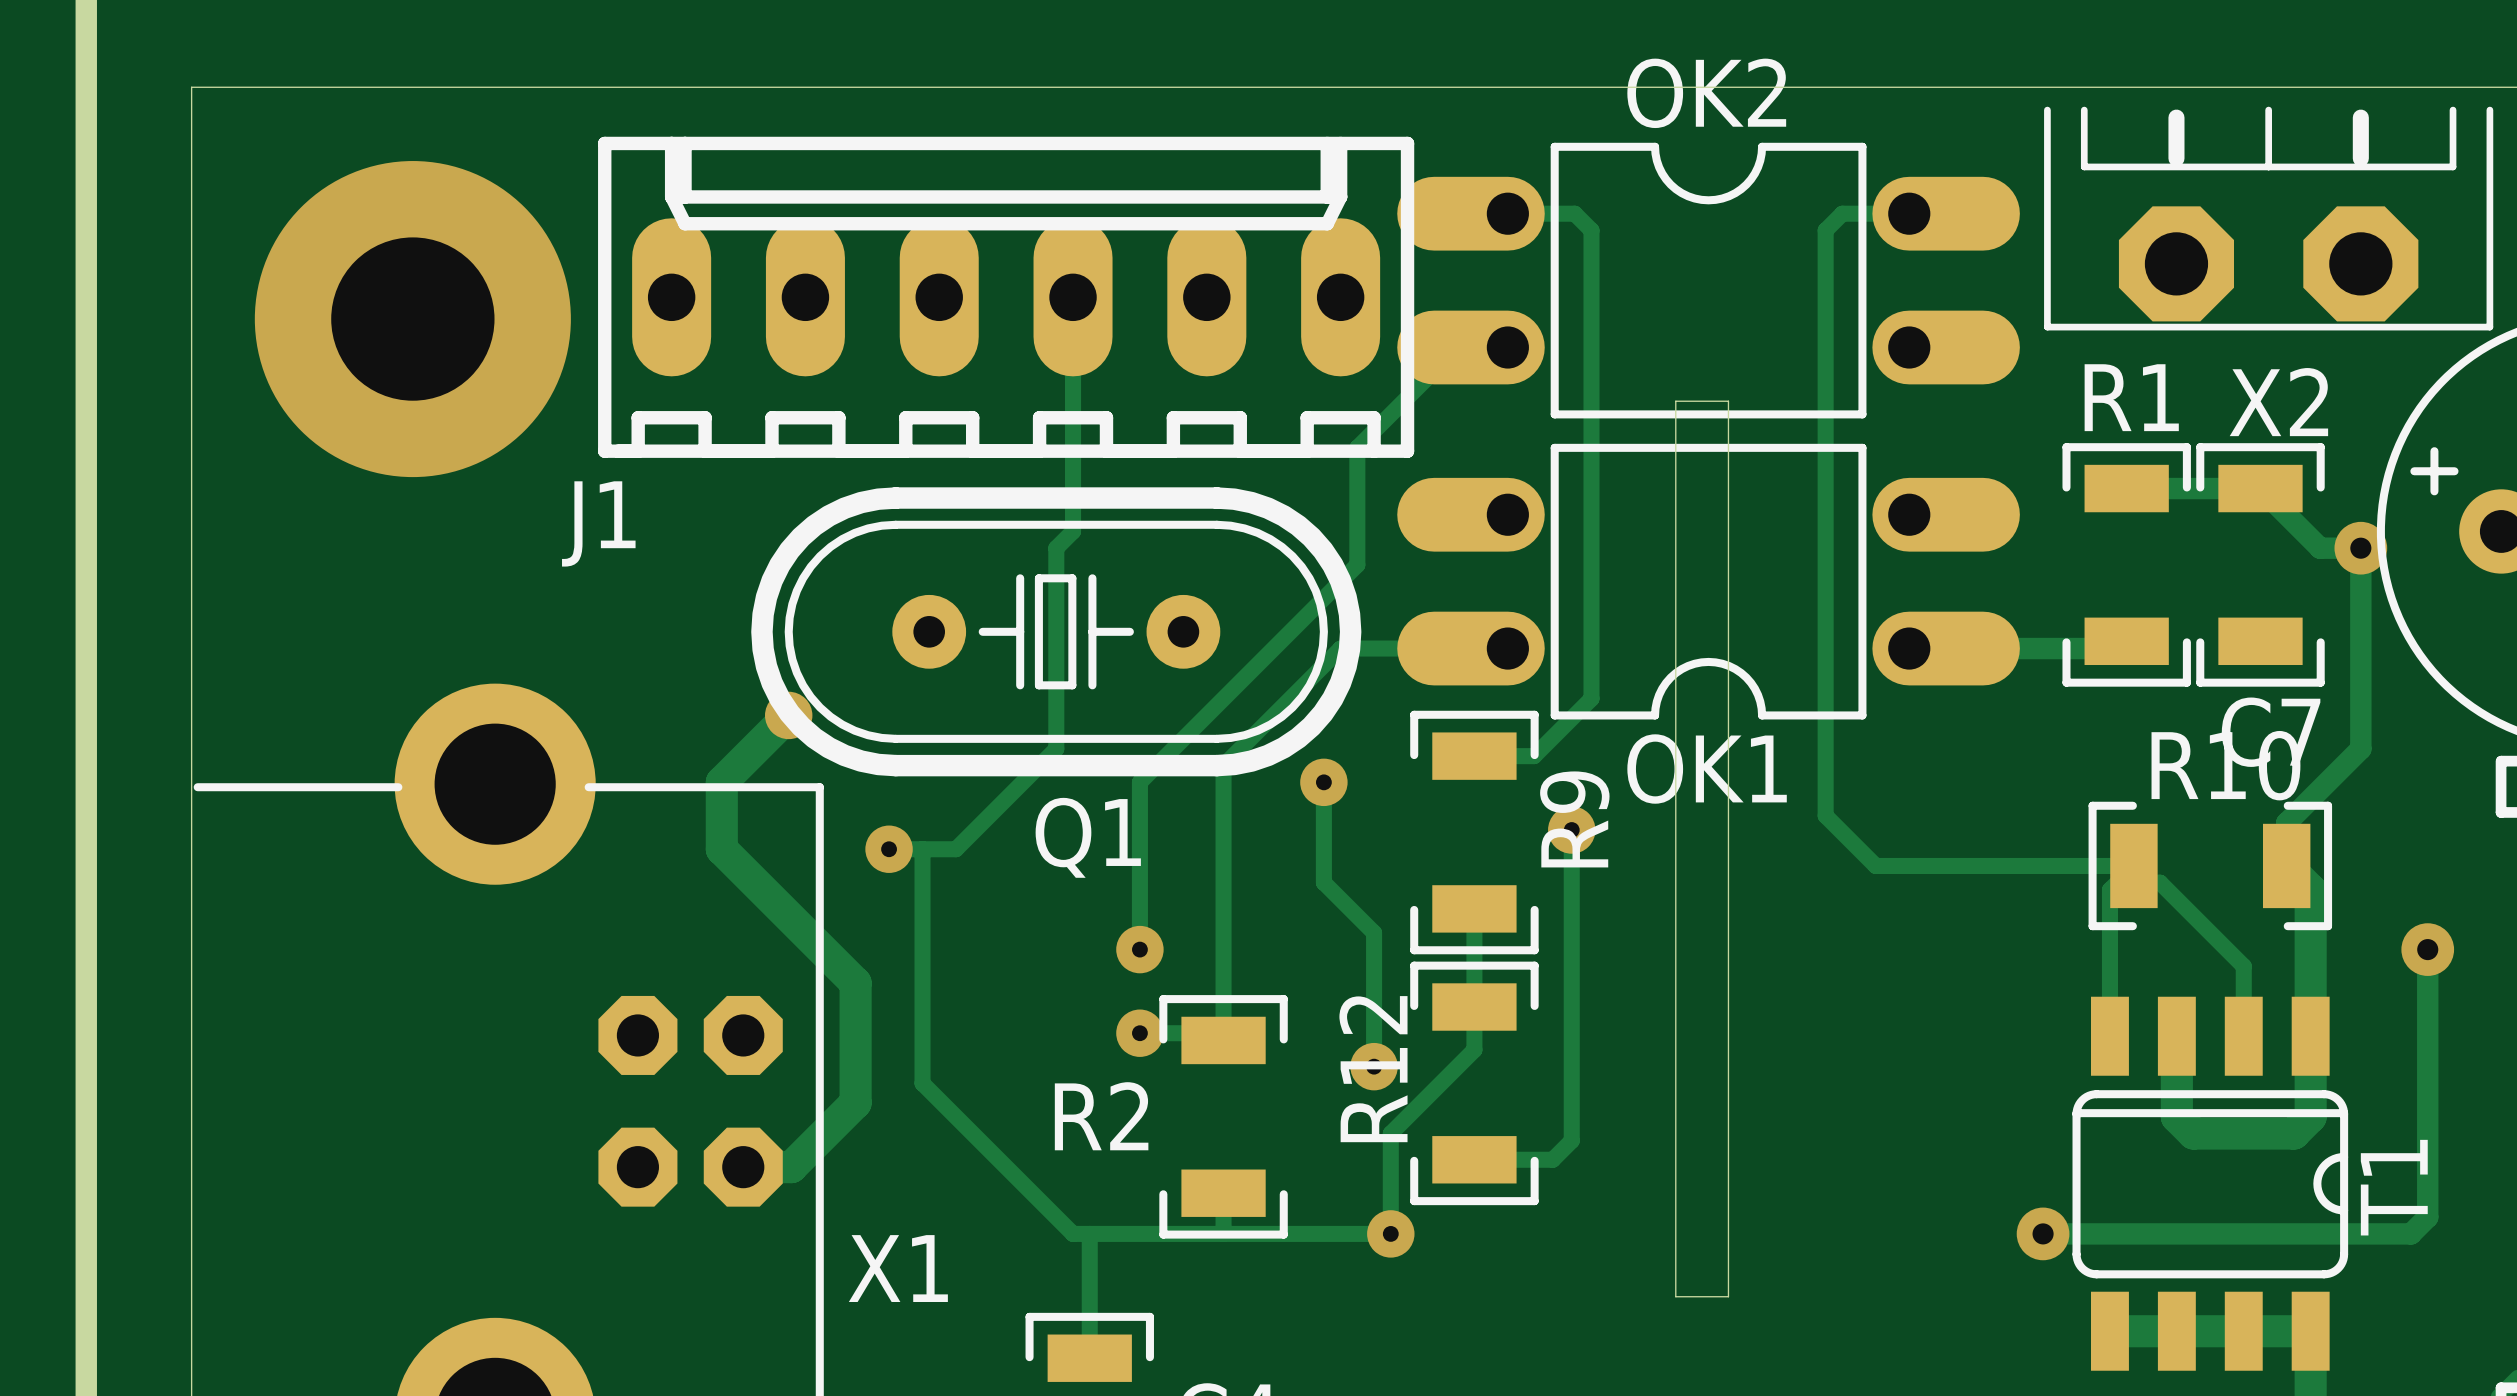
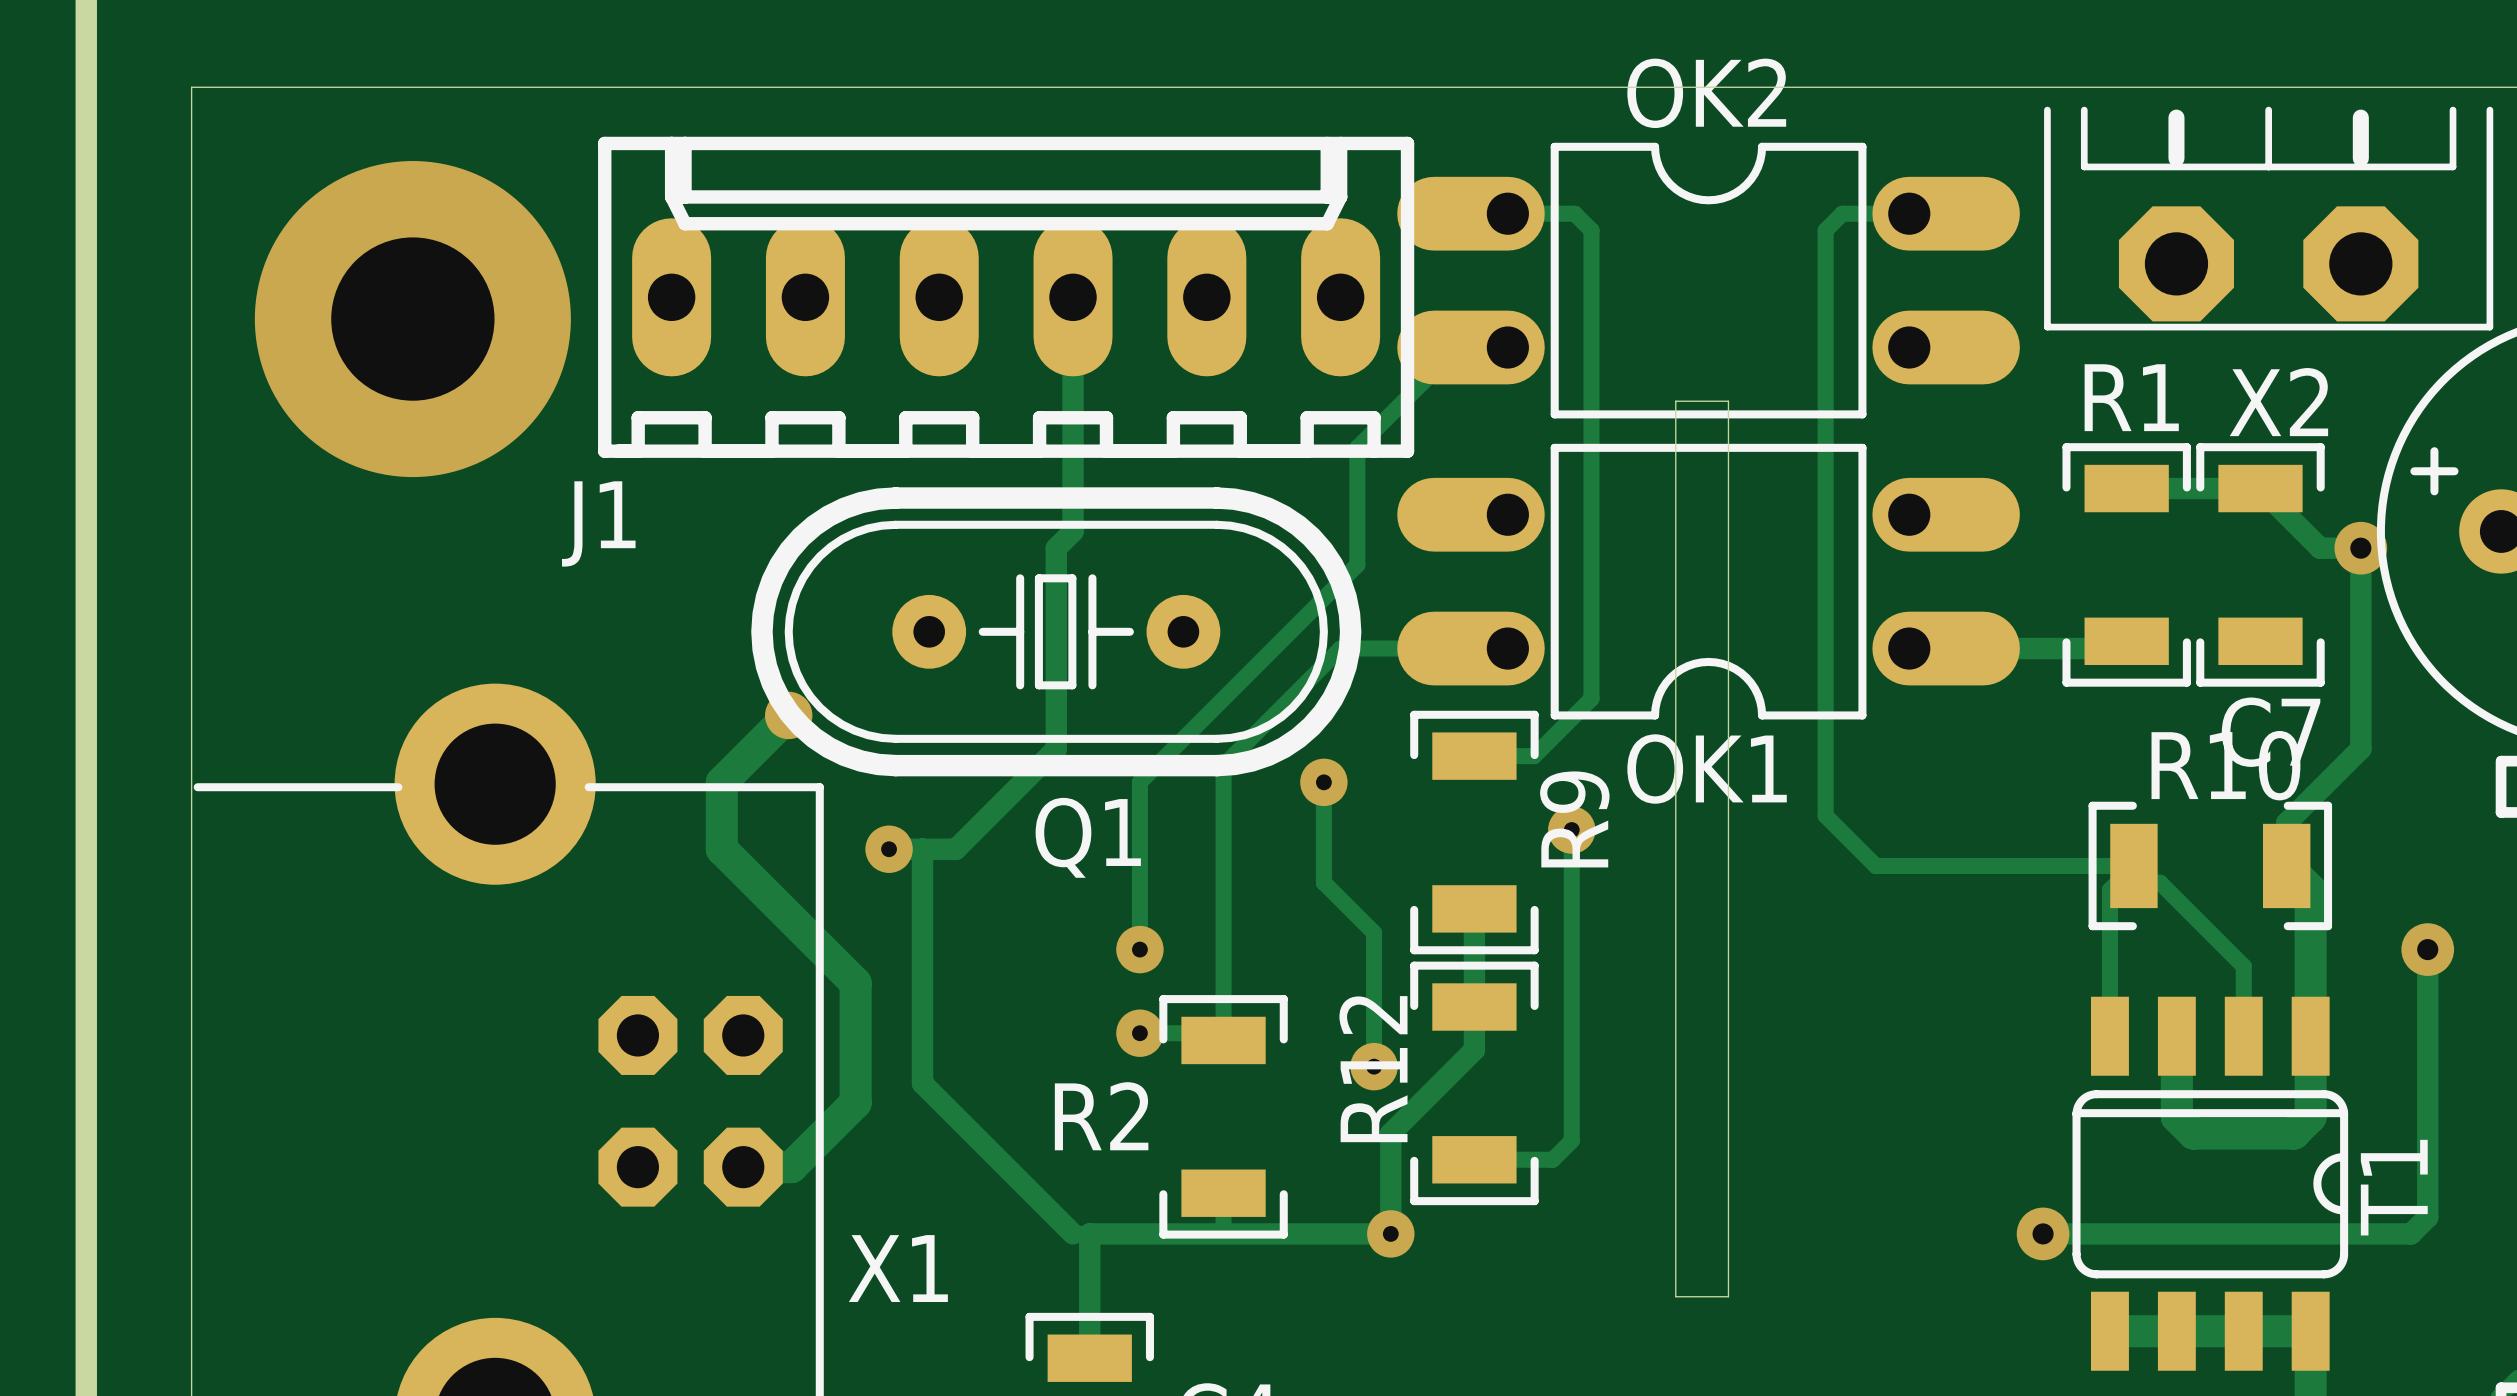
track width: thin (1073, 297) (1073, 531) (1056, 548) (1056, 748) (955, 849) (889, 849) -> thick (1073, 297) (1073, 531) (1056, 548) (1056, 748) (955, 849) (889, 849)
track width: thin (922, 849) (922, 1083) (1073, 1233) -> thick (922, 849) (922, 1083) (1073, 1233)
track width: thin (1474, 908) (1474, 1049) (1390, 1133) (1390, 1233) (1089, 1233) (1089, 1358) -> thick (1474, 908) (1474, 1049) (1390, 1133) (1390, 1233) (1089, 1233) (1089, 1358)

